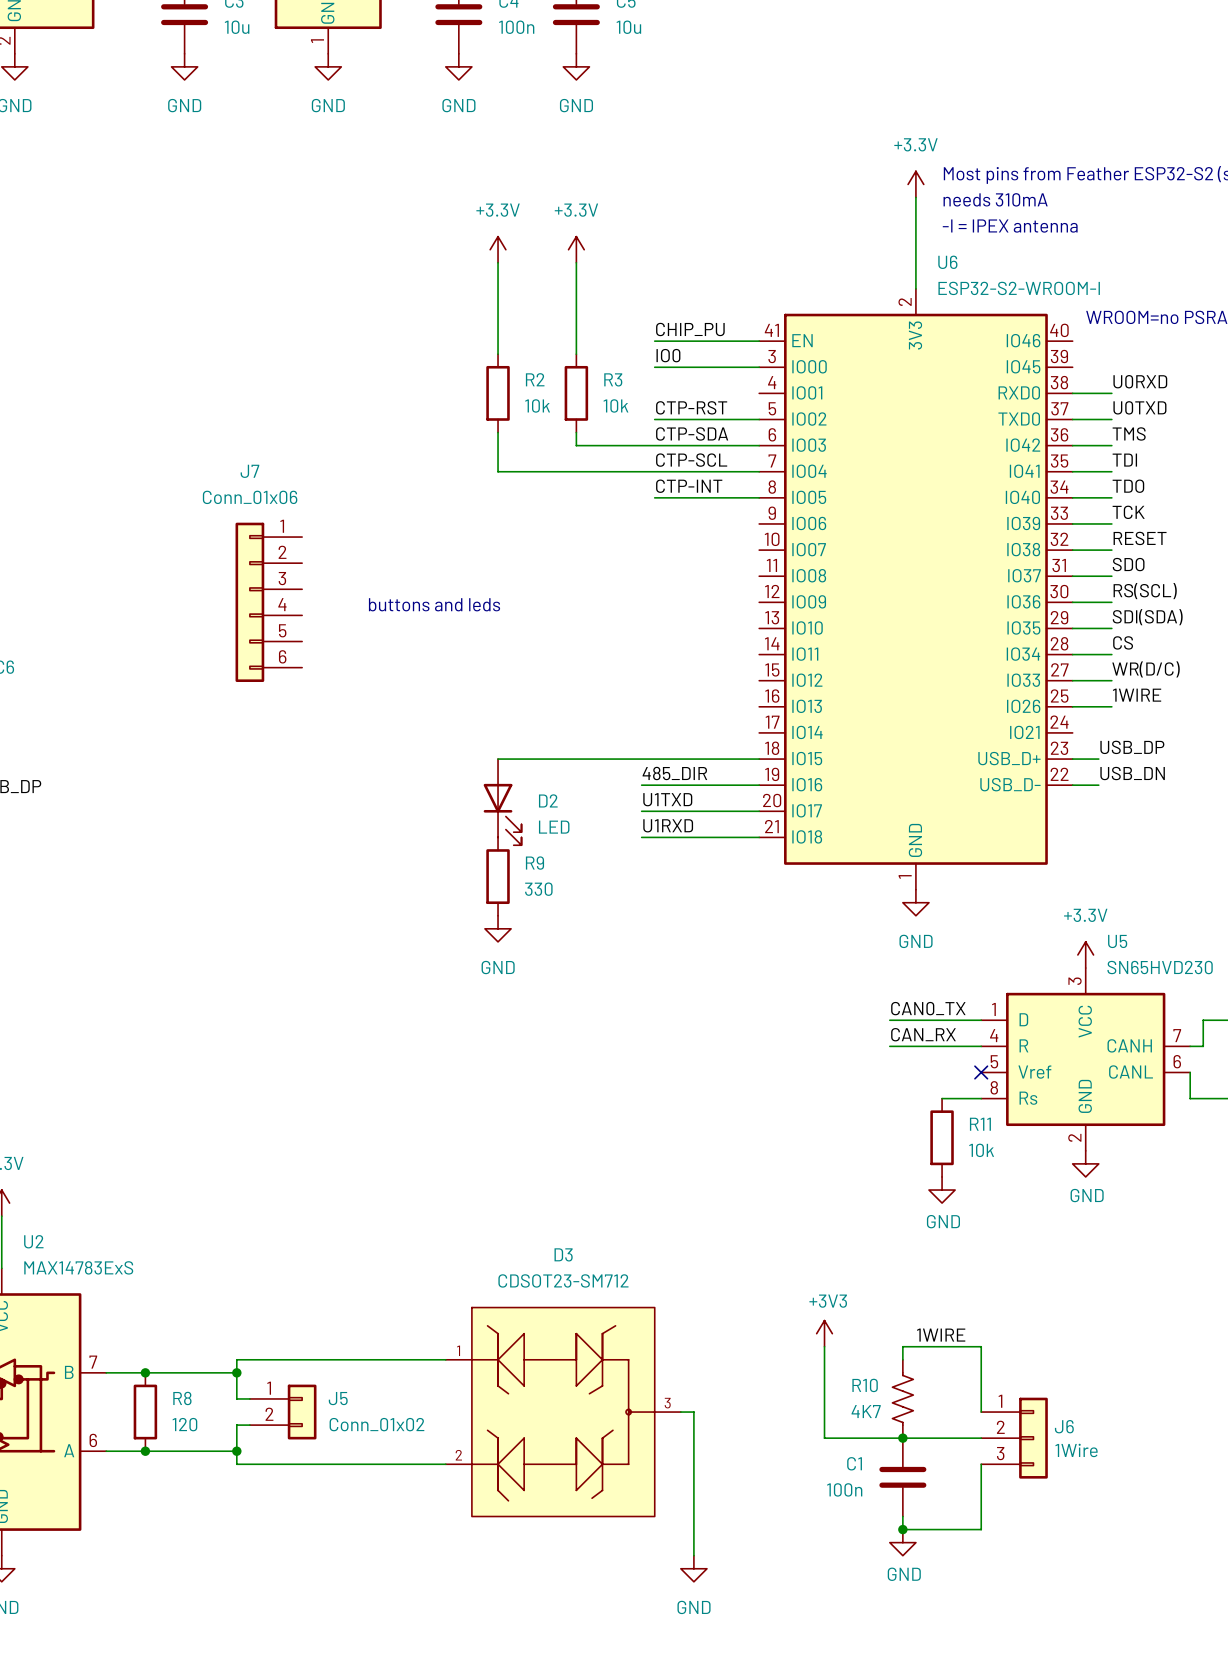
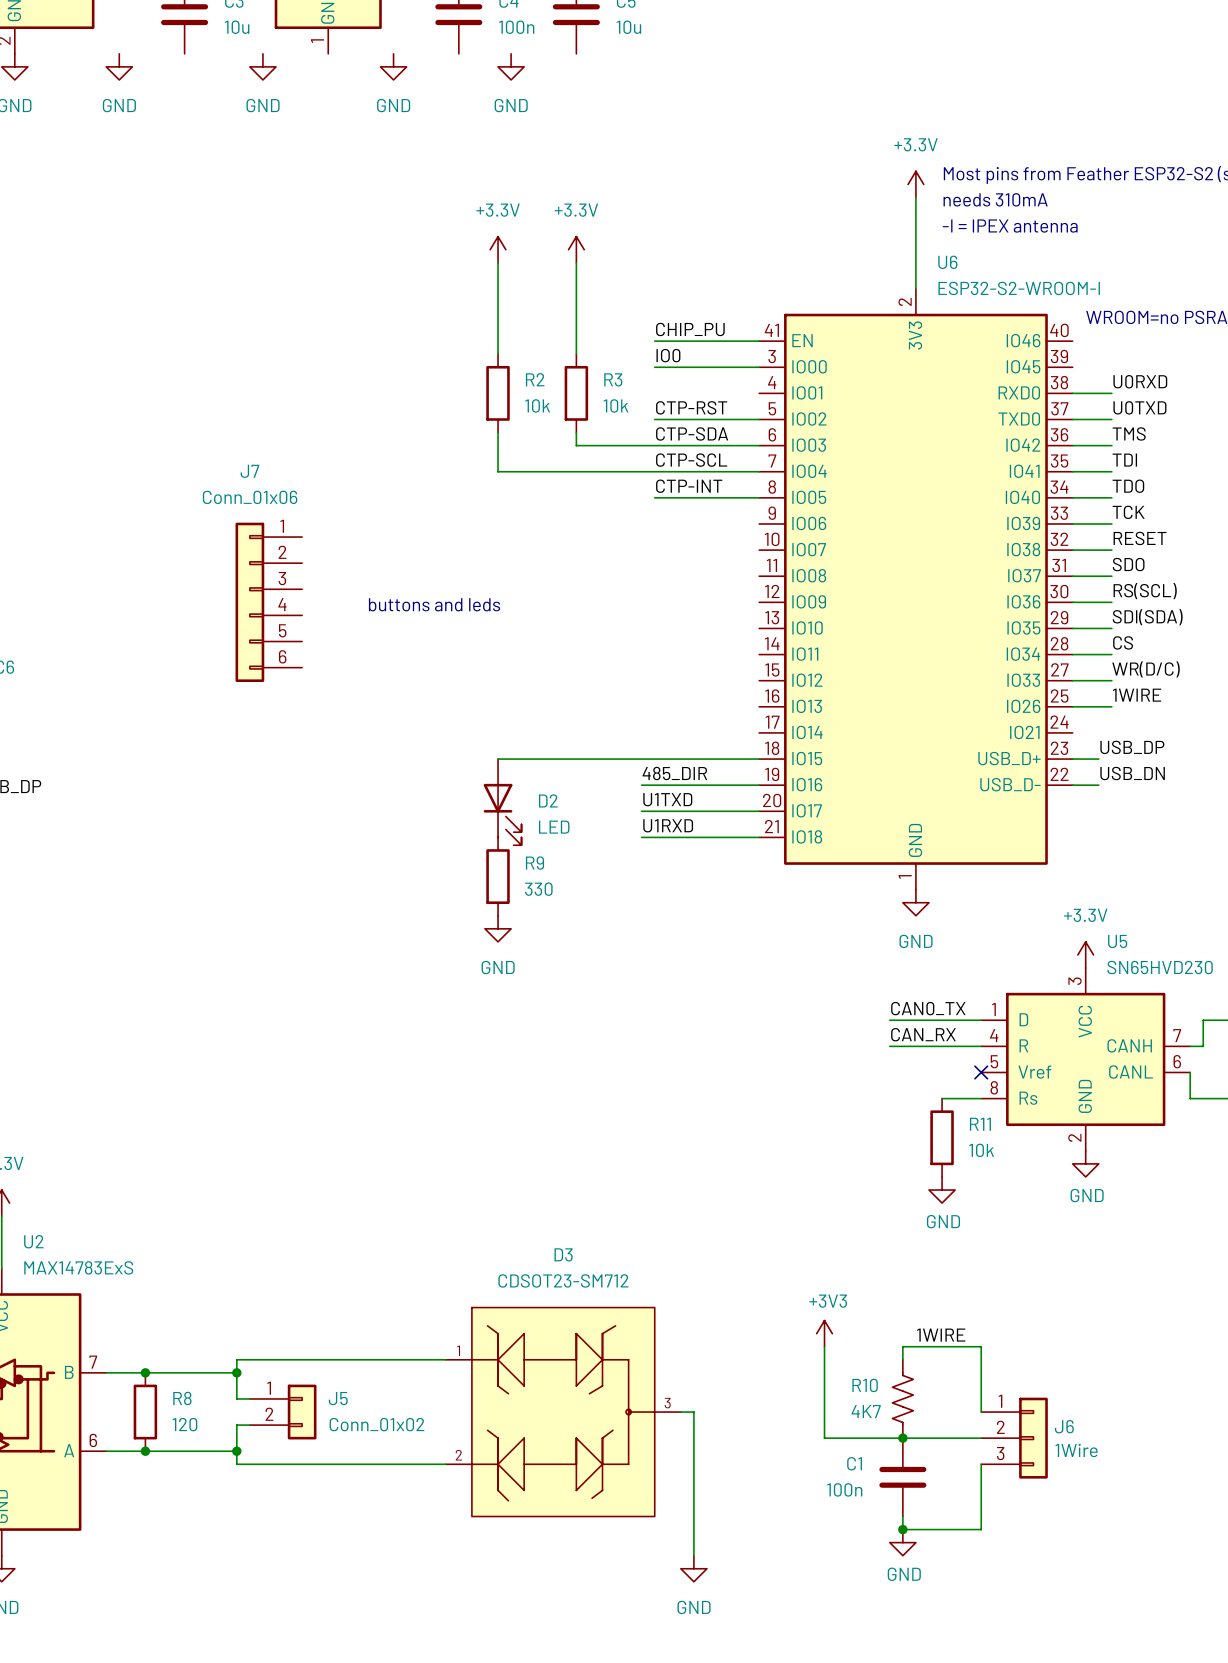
power symbol: none -> GND (119, 66)
power symbol: GND (184, 66) -> none
power symbol: none -> GND (262, 66)
power symbol: GND (328, 66) -> none
power symbol: none -> GND (393, 66)
power symbol: GND (458, 66) -> none
power symbol: none -> GND (511, 66)
power symbol: GND (576, 66) -> none

